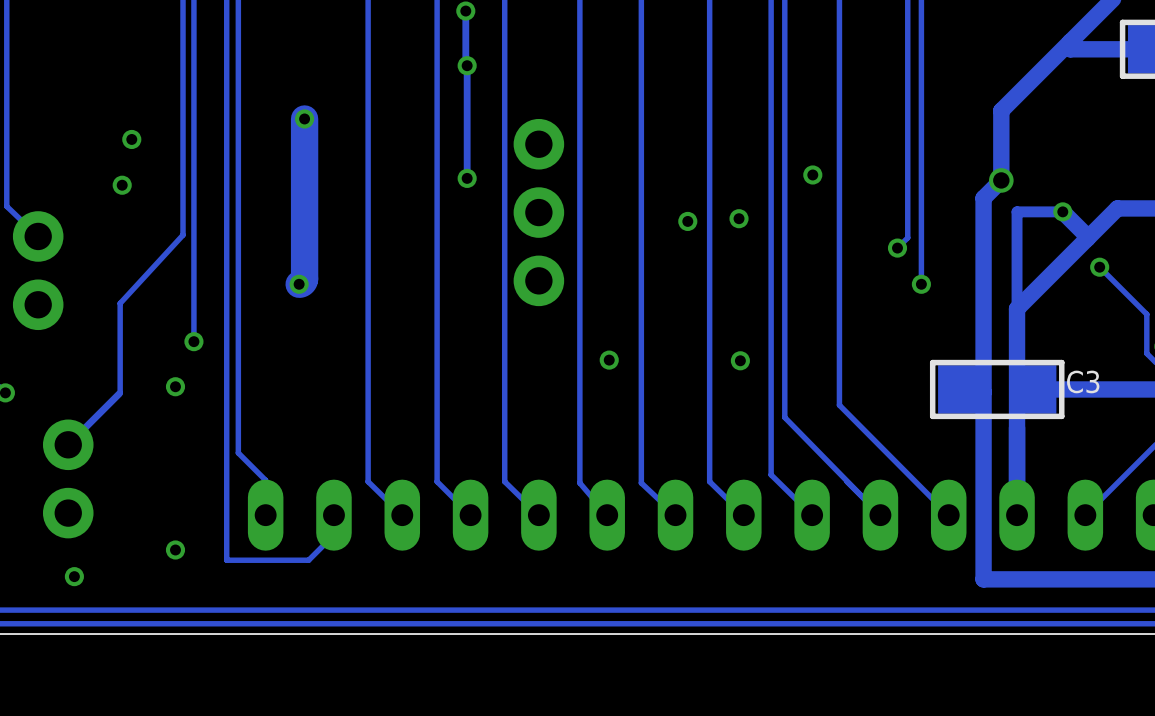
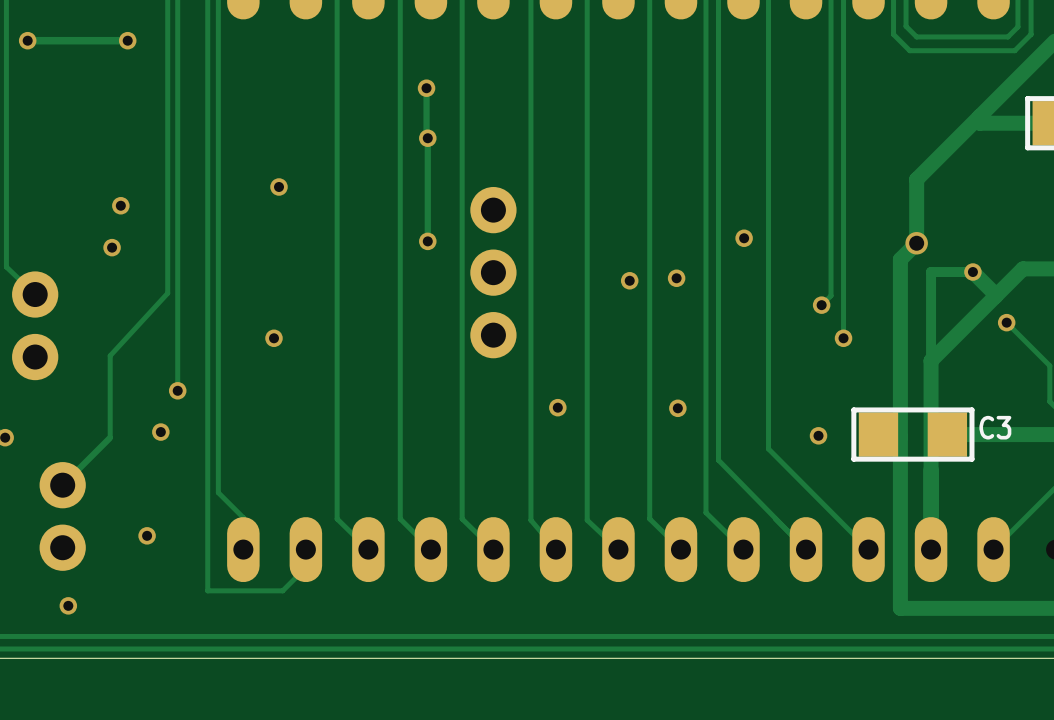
track: (304, 118) (304, 278) (302, 282) (299, 284) -> none
via: none -> (818, 435)
via position: (175, 549) -> (147, 535)

